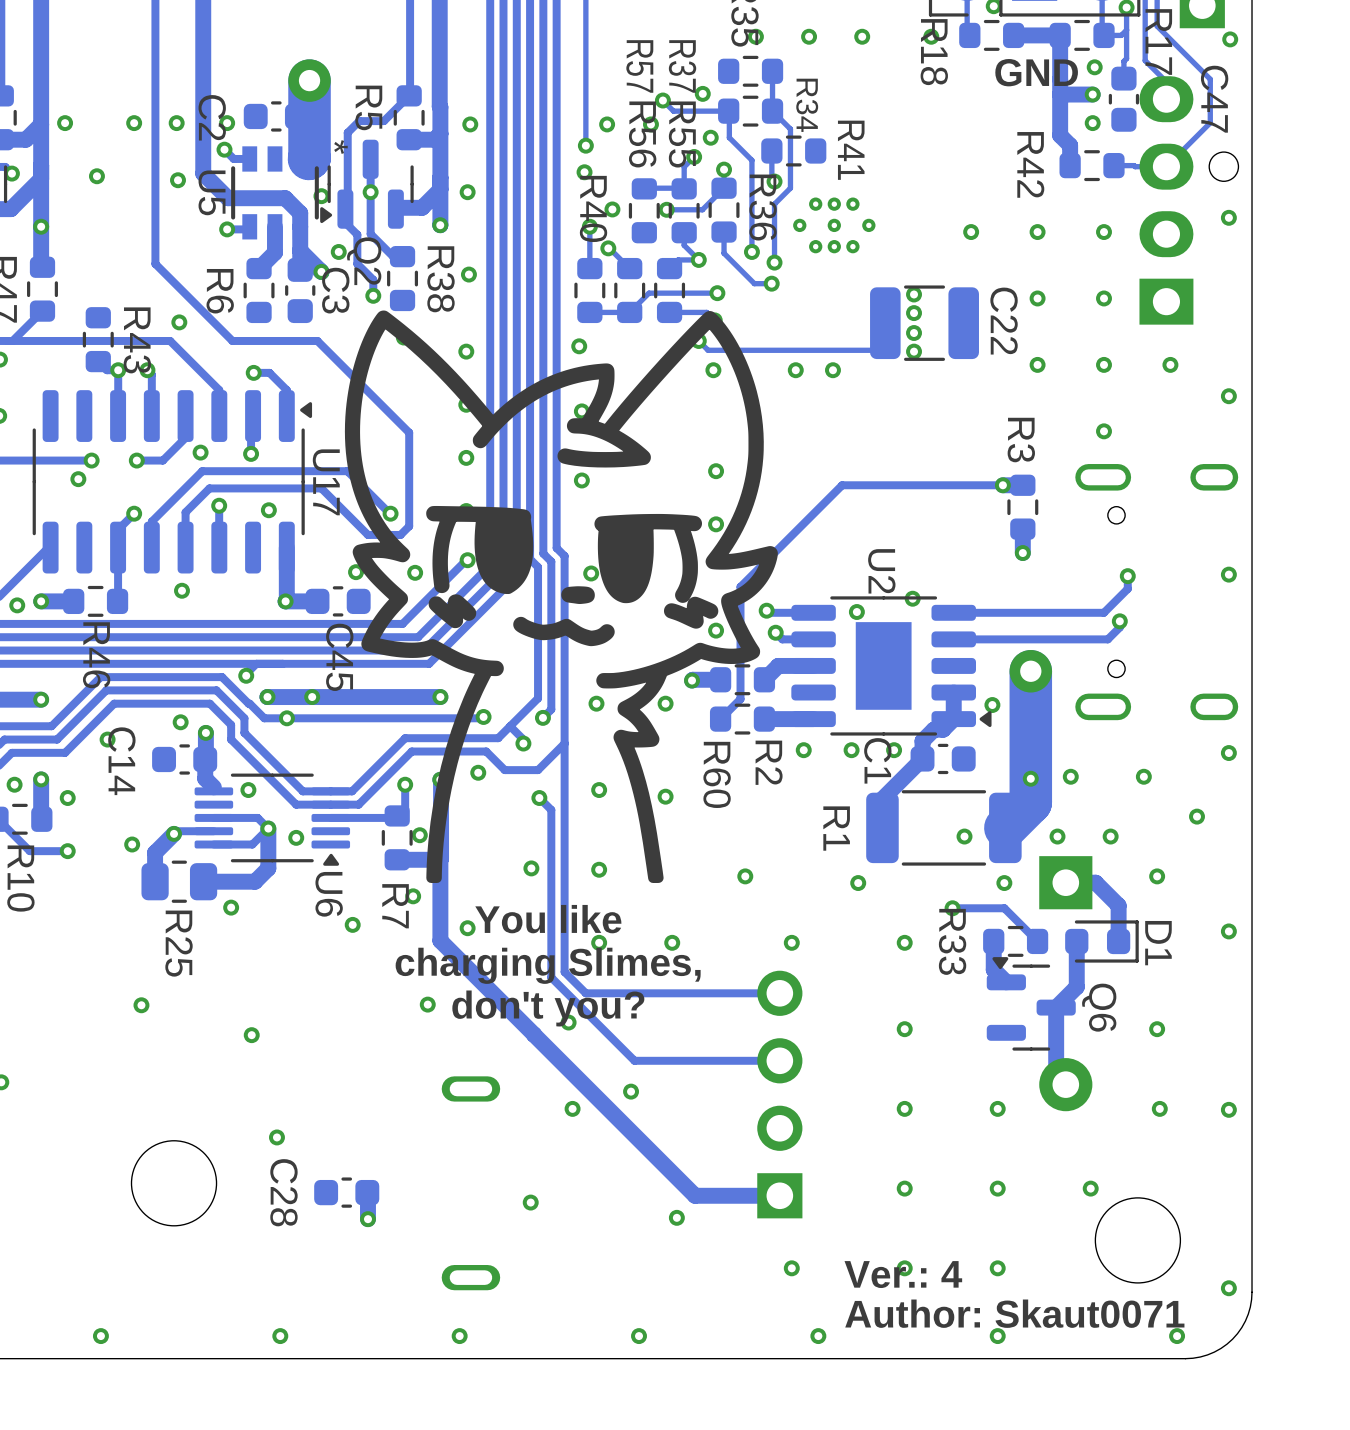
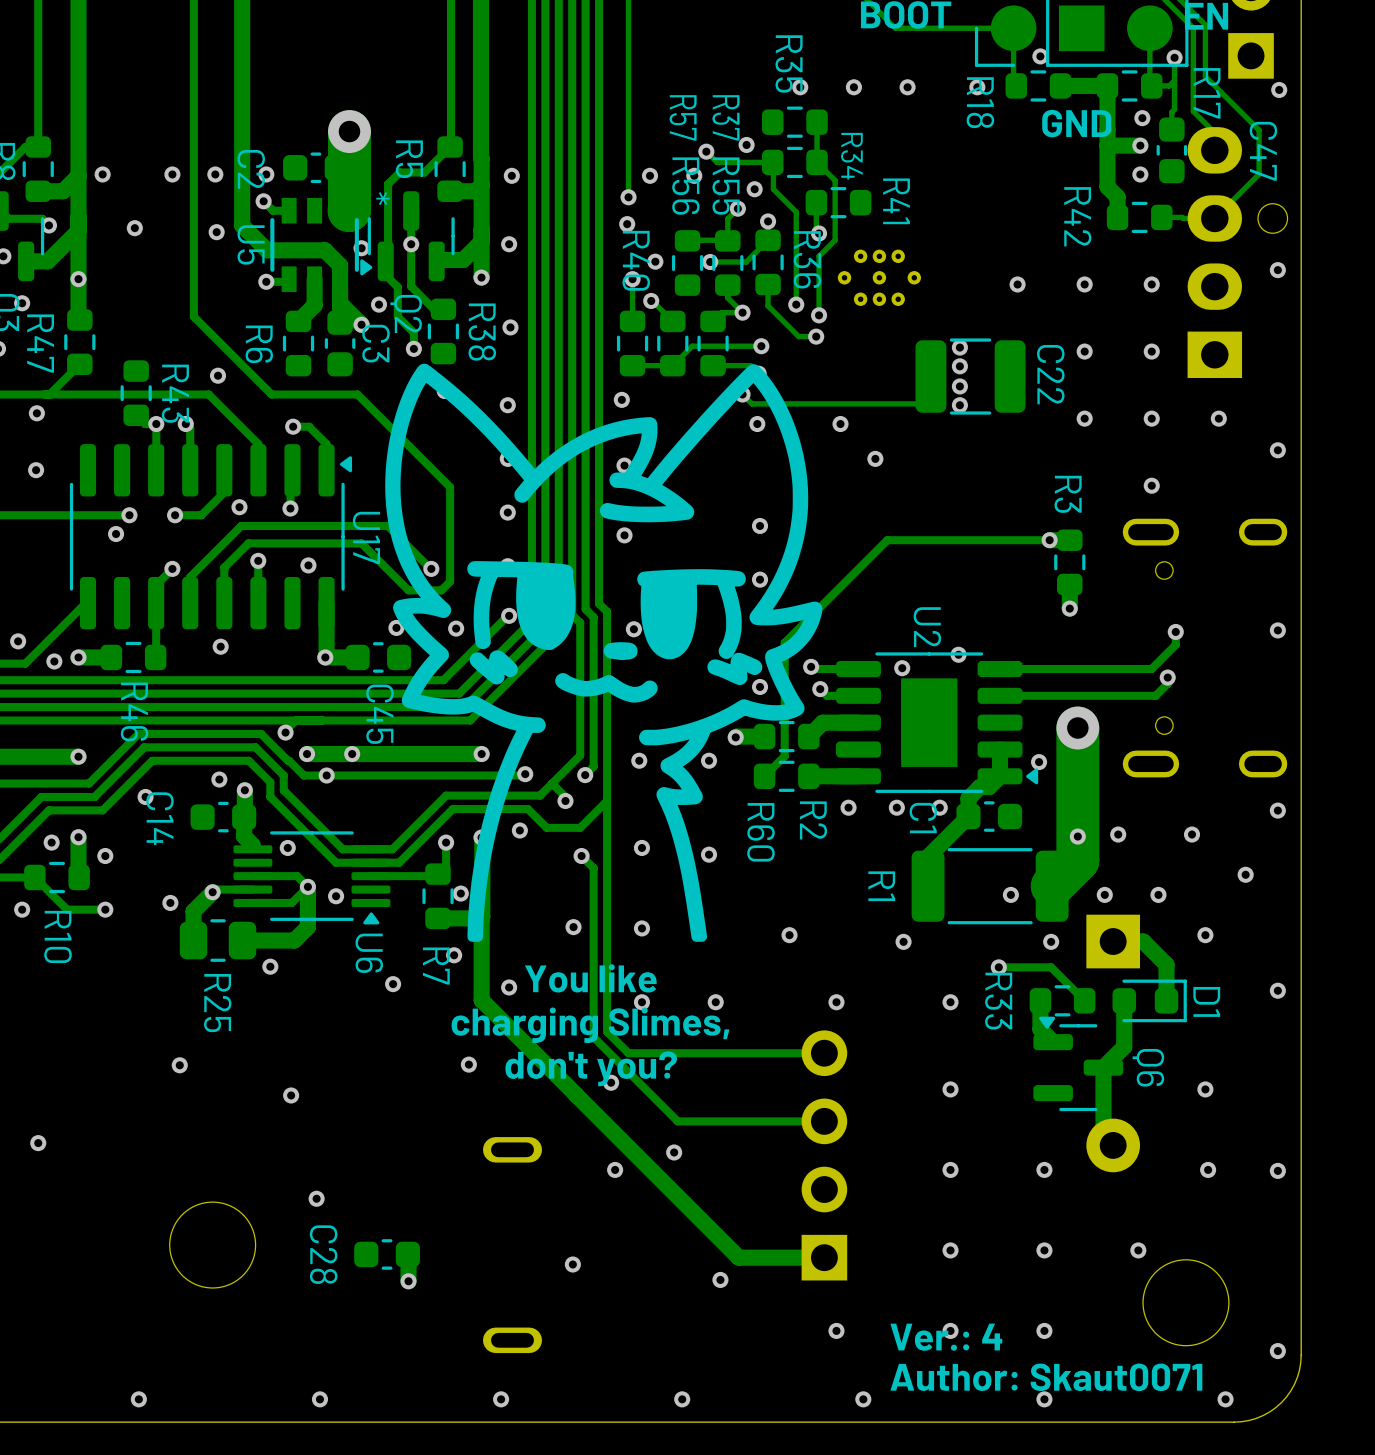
via position: (832, 370) -> (875, 458)

